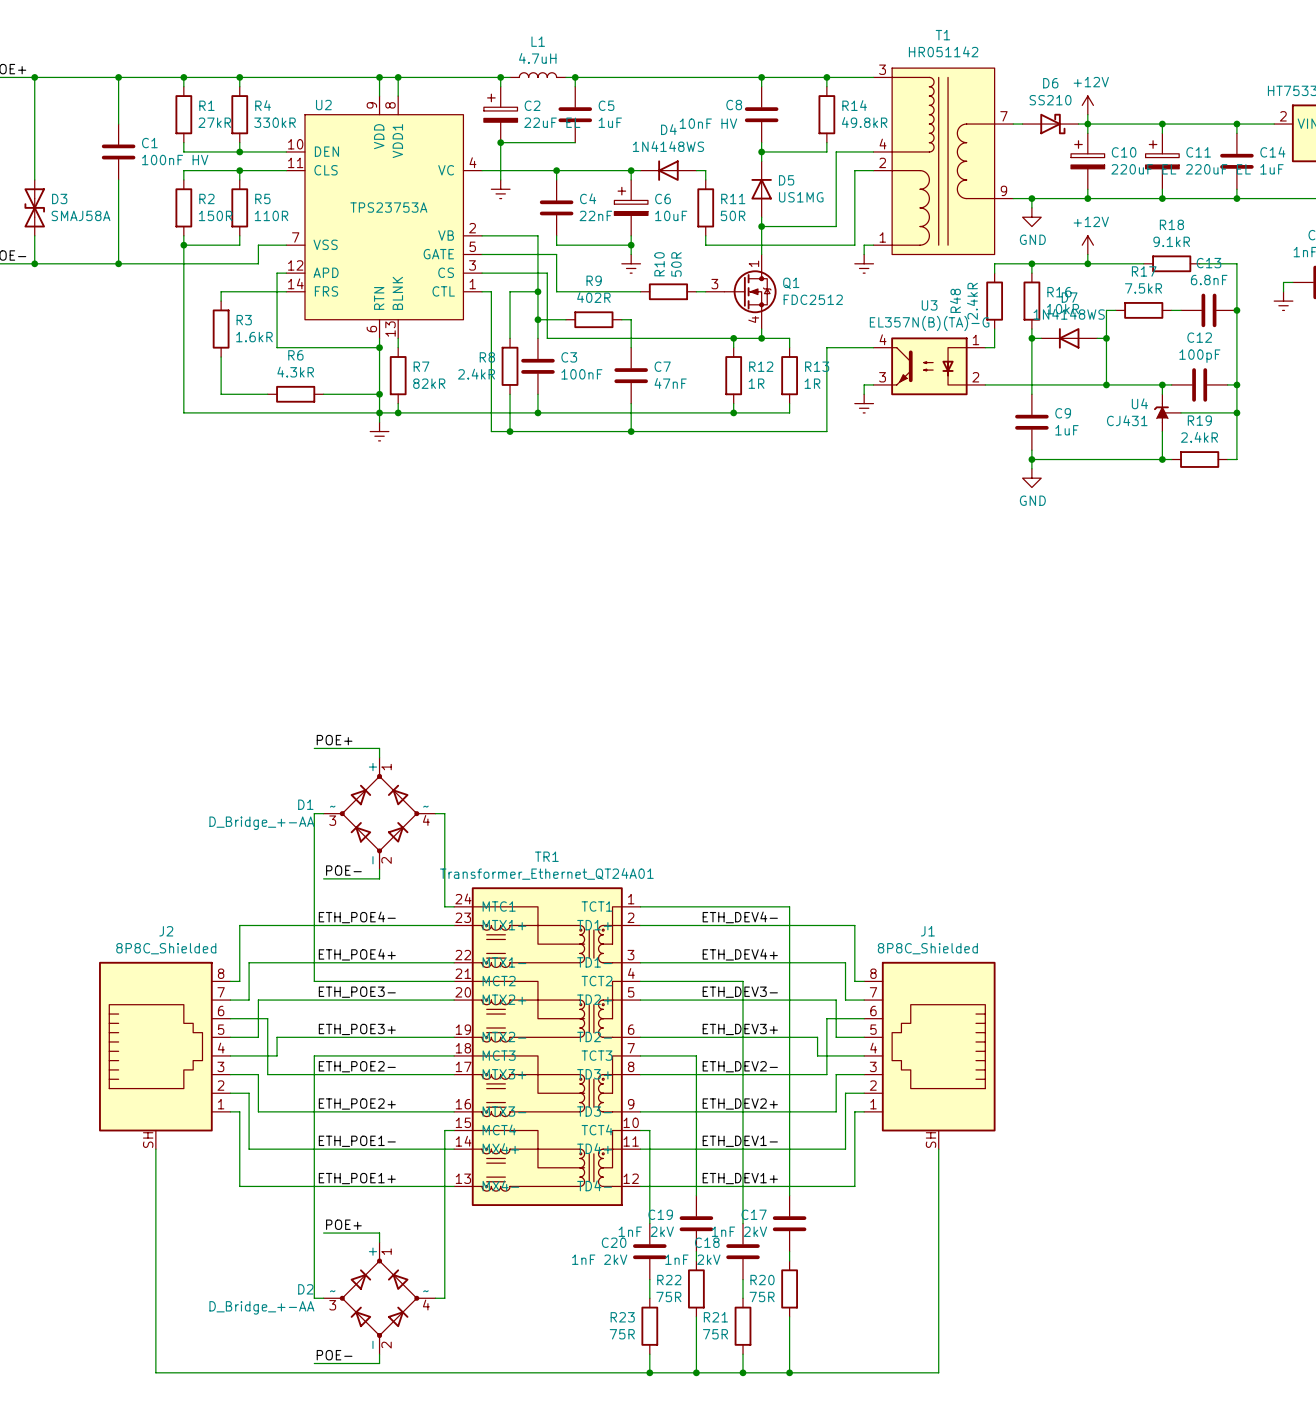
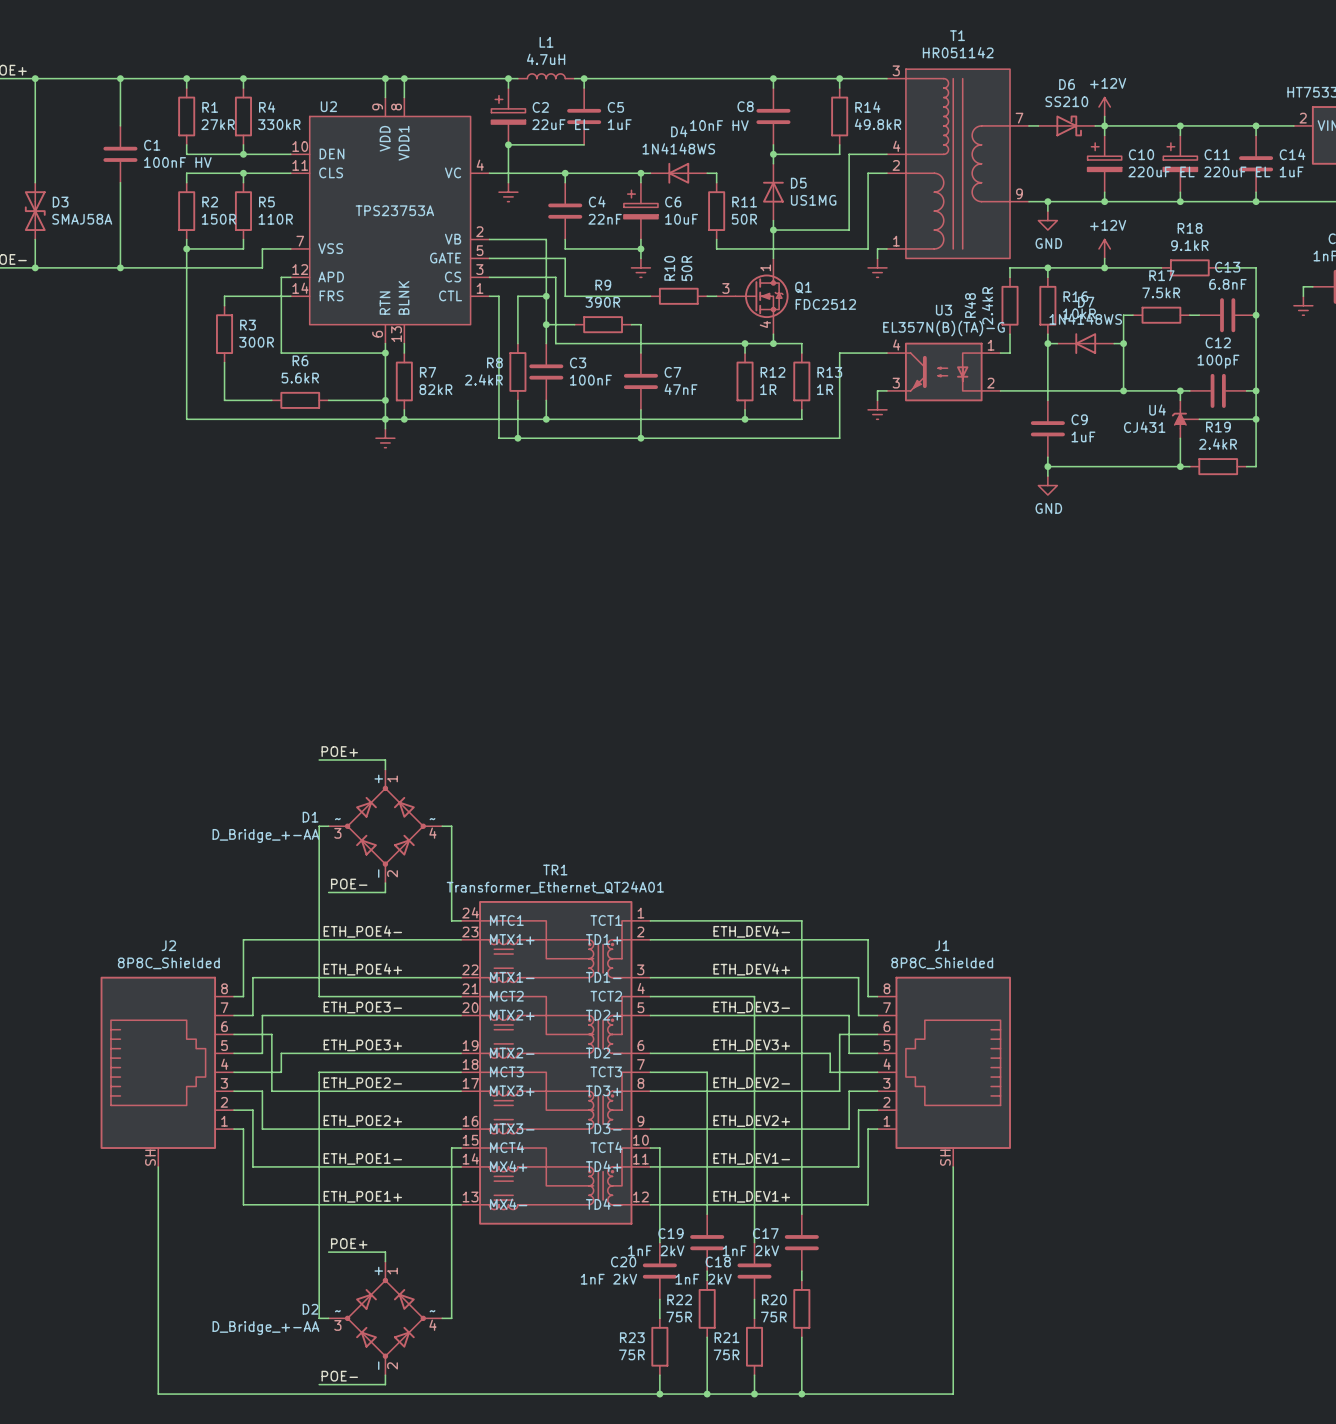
R9 value: 402R (593, 297) -> 390R (602, 302)
R3 value: 1.6kR (254, 337) -> 300R (256, 342)
R6 value: 4.3kR (295, 372) -> 5.6kR (300, 378)

